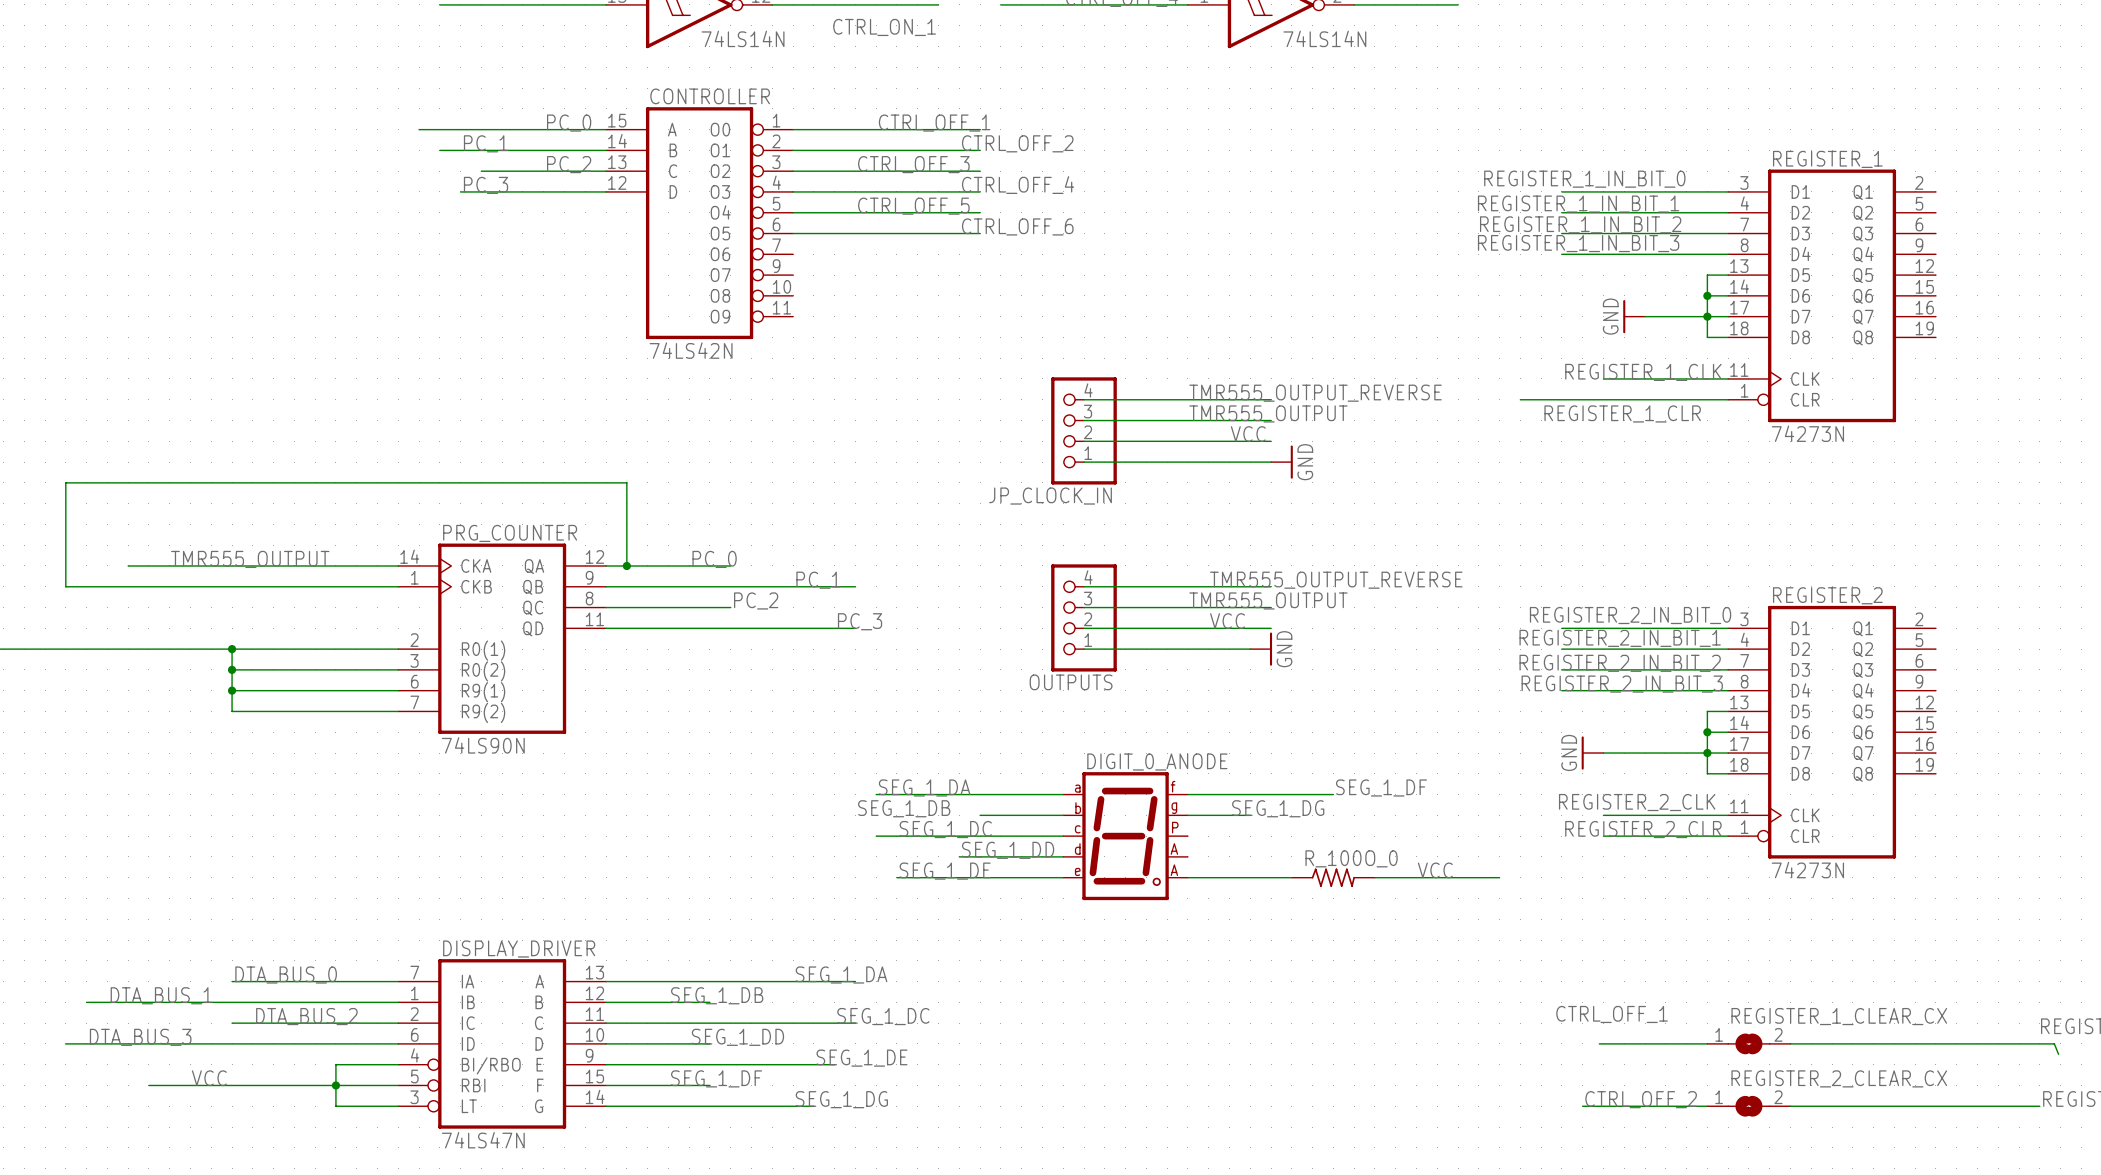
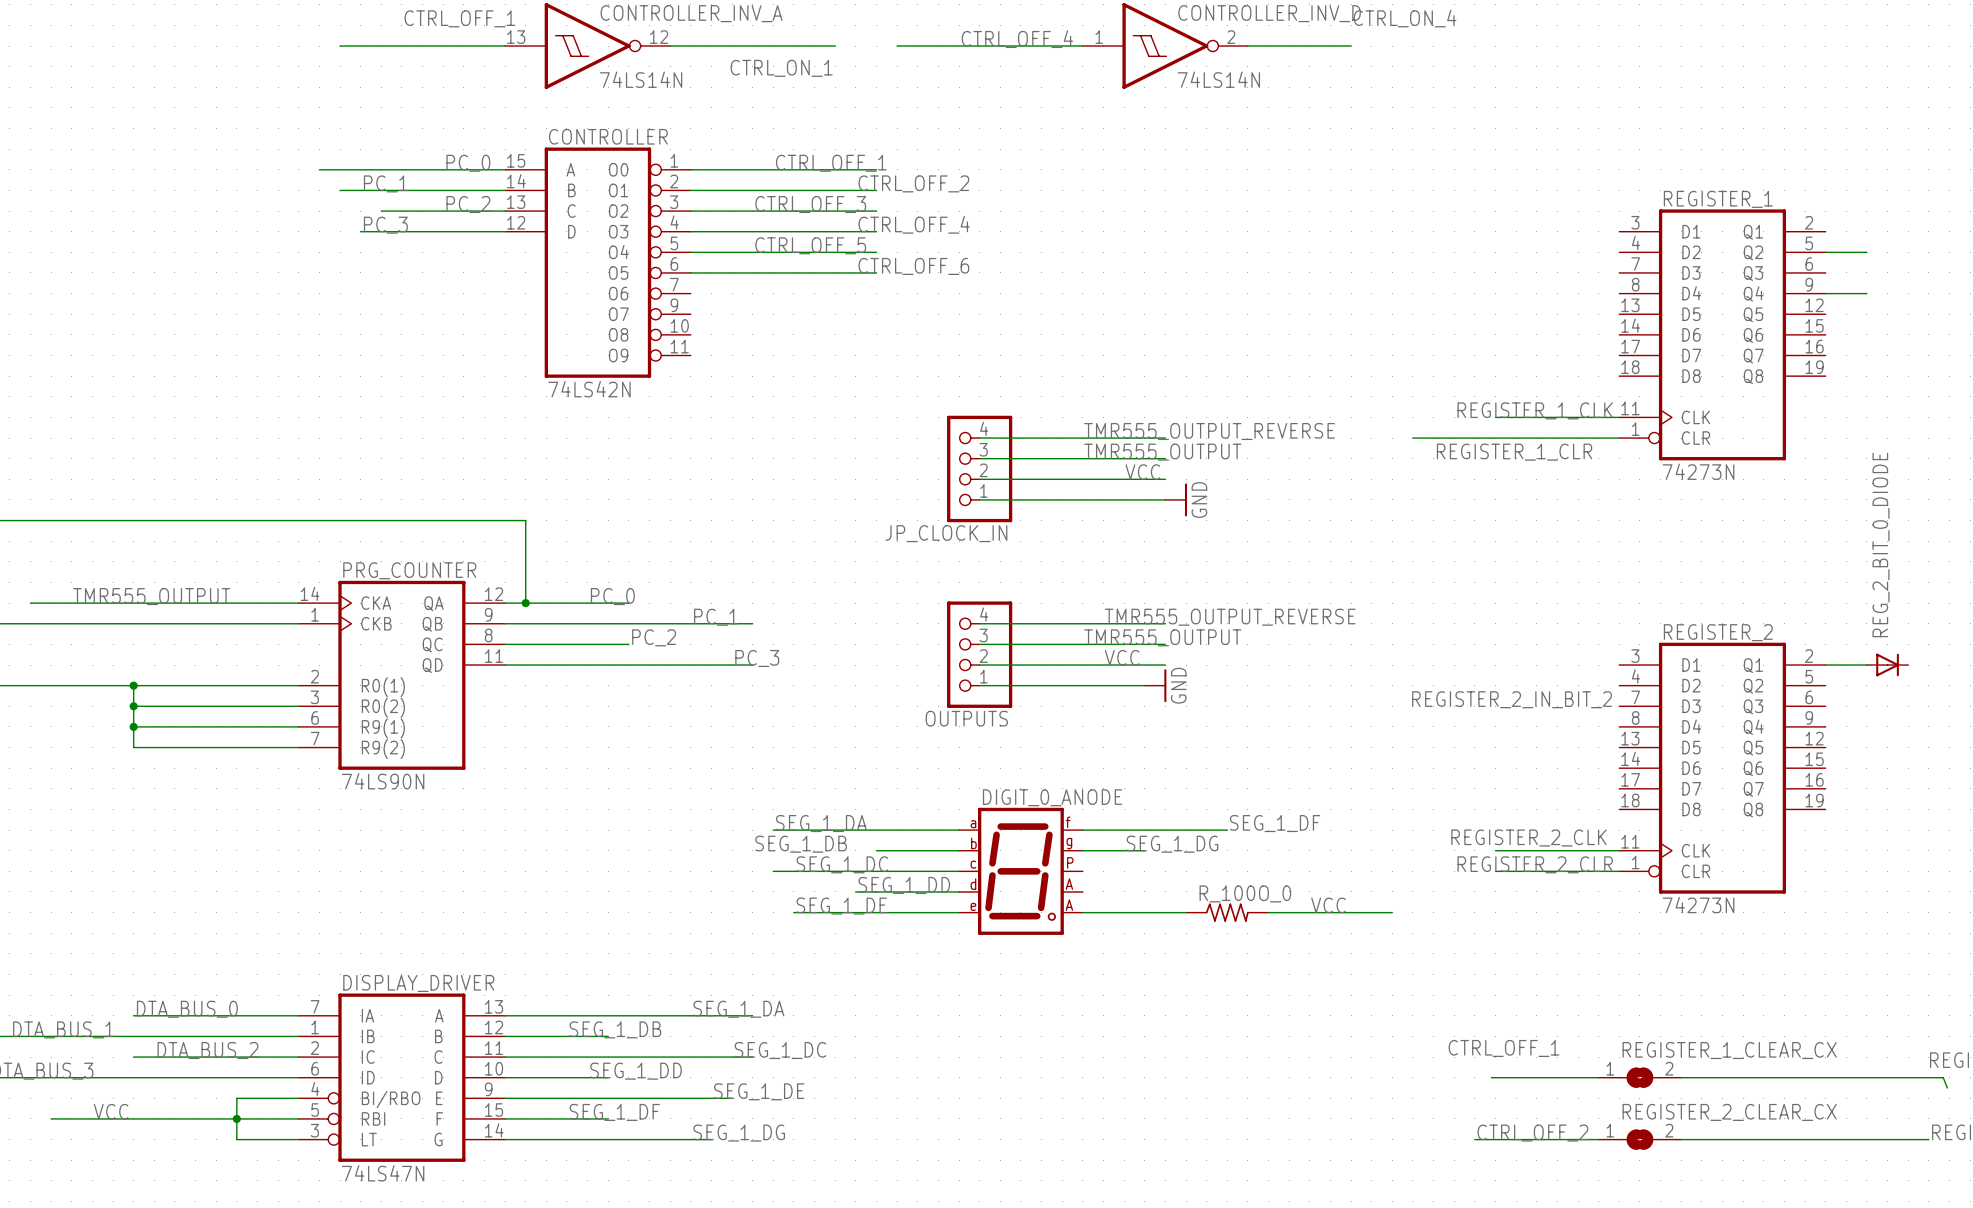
label: REGISTER_1_IN_BIT_0 (1584, 179) -> none
wire: (1561, 191) (1728, 191) -> none
label: REGISTER_1_IN_BIT_1 (1578, 204) -> none
wire: (1561, 212) (1728, 212) -> none
wire: none -> (1825, 252) (1866, 252)
label: REGISTER_1_IN_BIT_2 (1580, 224) -> none
wire: (1561, 233) (1728, 233) -> none
label: REGISTER_1_IN_BIT_3 (1578, 243) -> none
wire: (1561, 254) (1728, 254) -> none
wire: none -> (1825, 293) (1866, 293)
wire: (1728, 275) (1707, 275) (1707, 337) (1728, 337) -> none
wire: (1707, 295) (1728, 295) -> none
junction: (1707, 295) -> none
power symbol: GND (1634, 316) -> none
wire: (1645, 316) (1728, 316) -> none
junction: (1707, 316) -> none
label: REGISTER_2_IN_BIT_0 (1630, 615) -> none
wire: (1561, 628) (1728, 628) -> none
wire: none -> (1825, 665) (1866, 665)
REG_2_BIT_0_DIODE: none -> (1887, 665)
label: REGISTER_2_IN_BIT_1 (1620, 638) -> none
wire: (1561, 649) (1728, 649) -> none
wire: (1561, 669) (1728, 669) -> none
label: REGISTER_2_IN_BIT_3 (1622, 684) -> none
wire: (1561, 690) (1728, 690) -> none
wire: (1728, 711) (1707, 711) (1707, 773) (1728, 773) -> none
wire: (1707, 732) (1728, 732) -> none
junction: (1707, 732) -> none
power symbol: GND (1592, 753) -> none
wire: (1603, 753) (1728, 753) -> none
junction: (1707, 753) -> none

